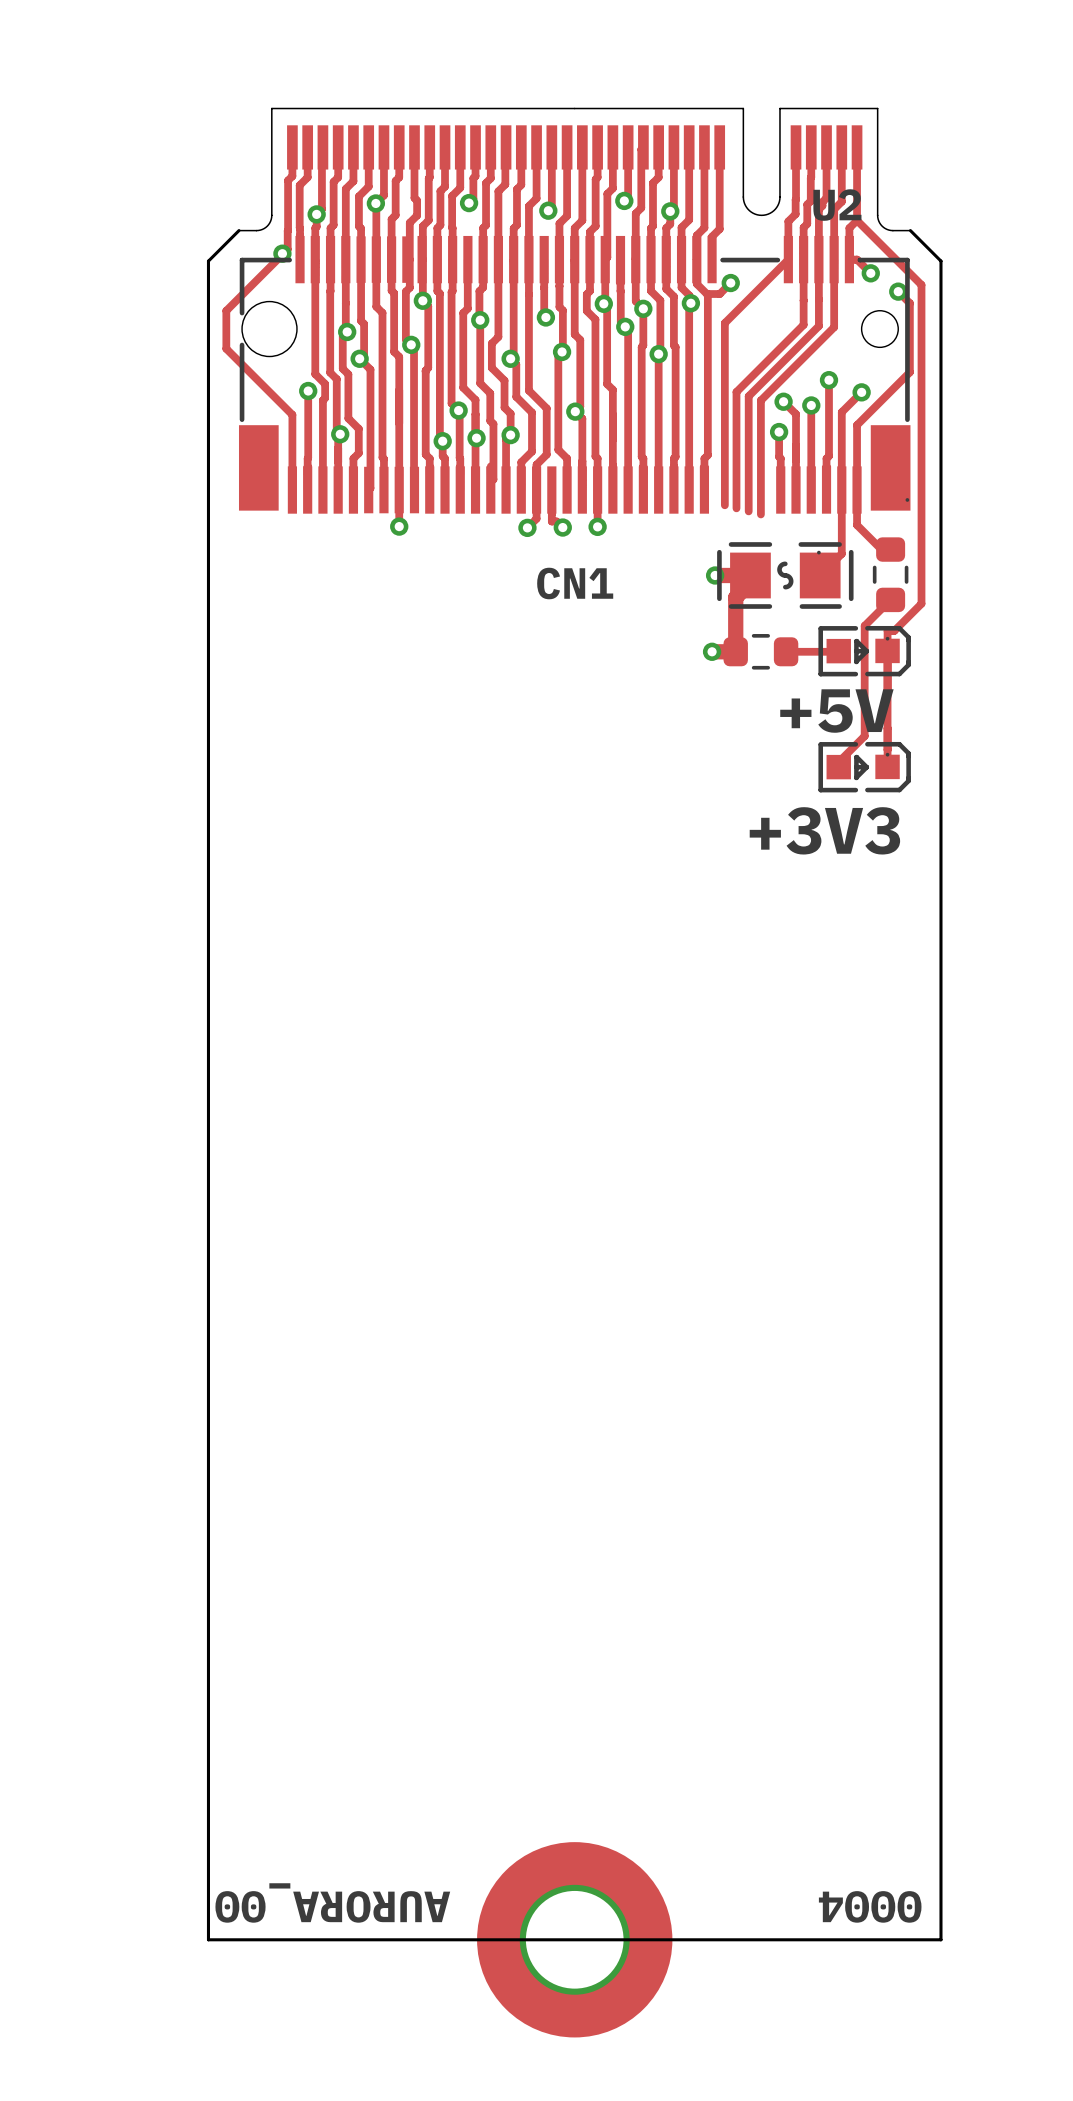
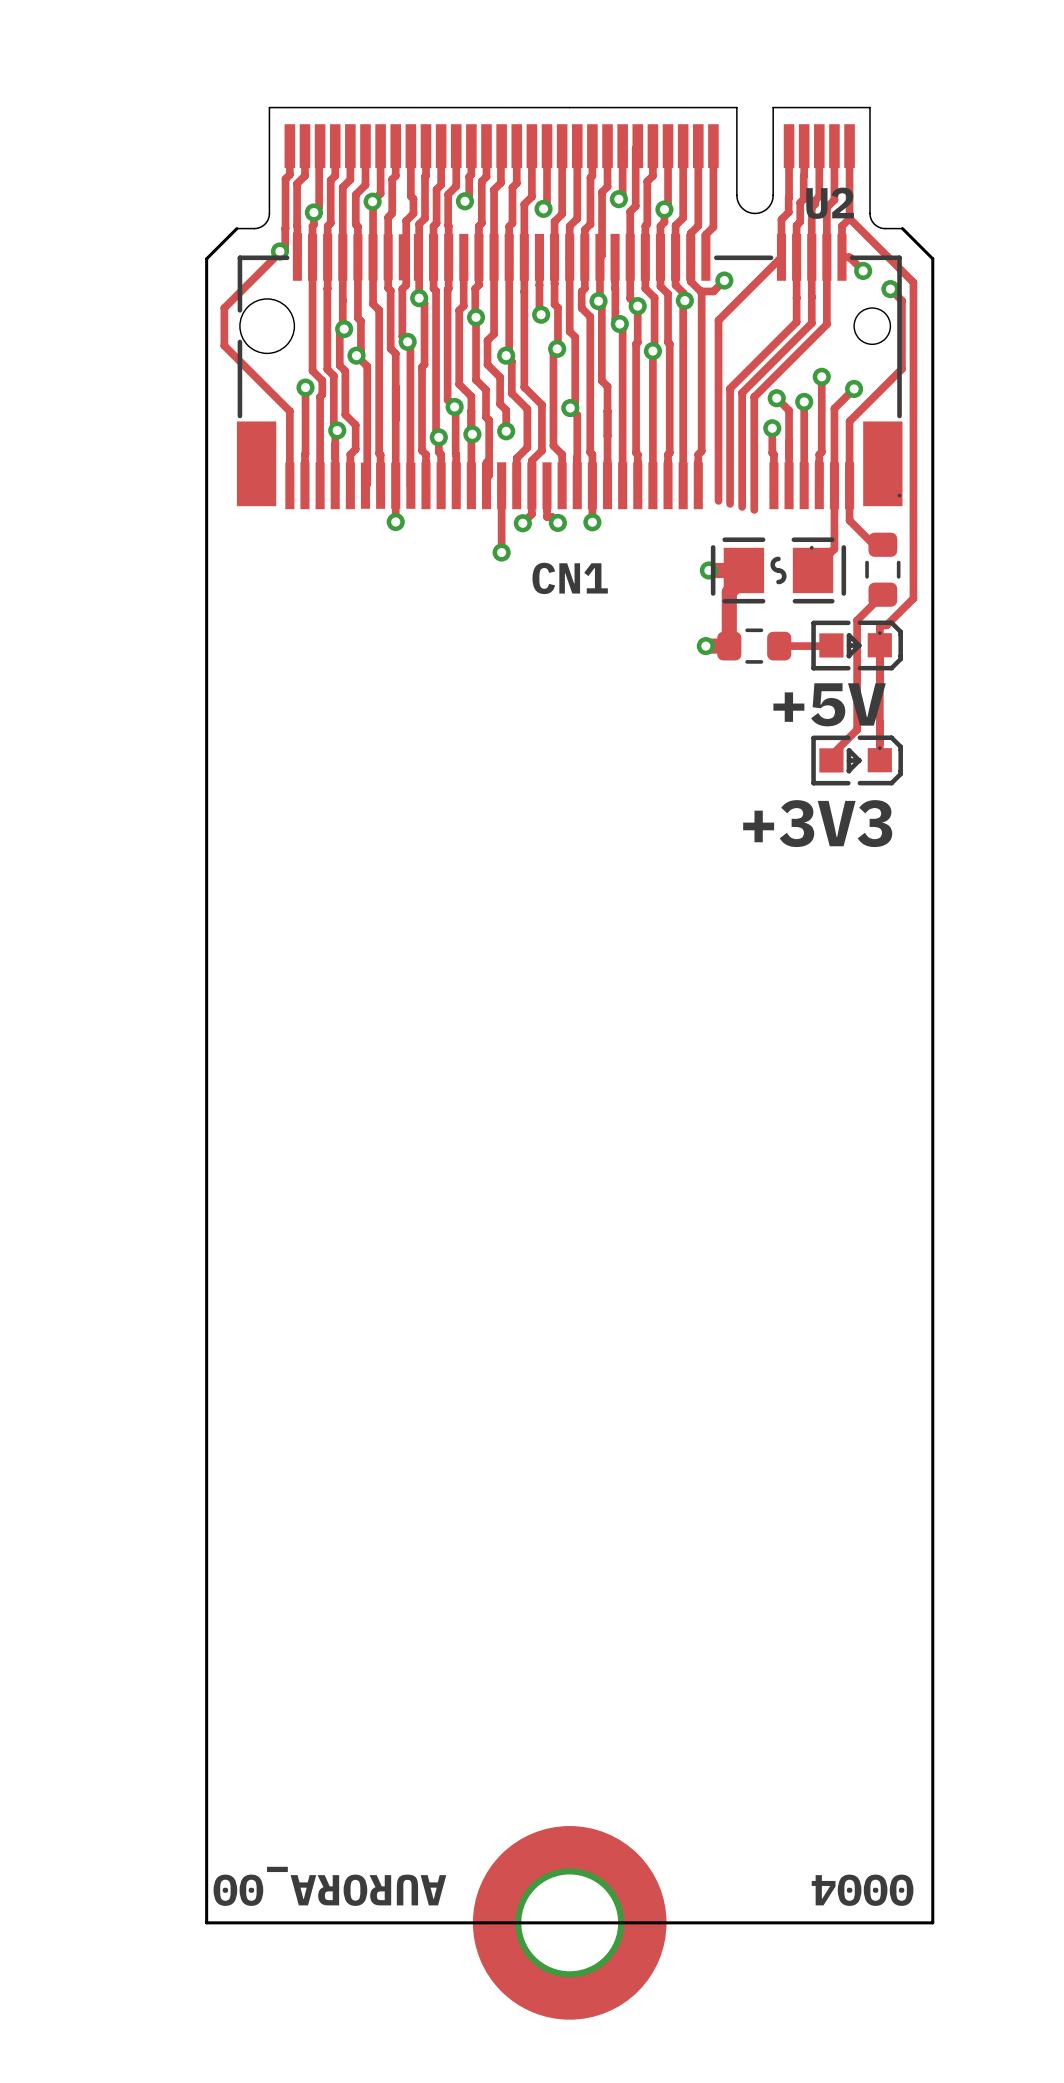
track: (510, 435) (506, 439) (506, 490) -> (501, 552) (501, 485)
via: none -> (501, 552)

